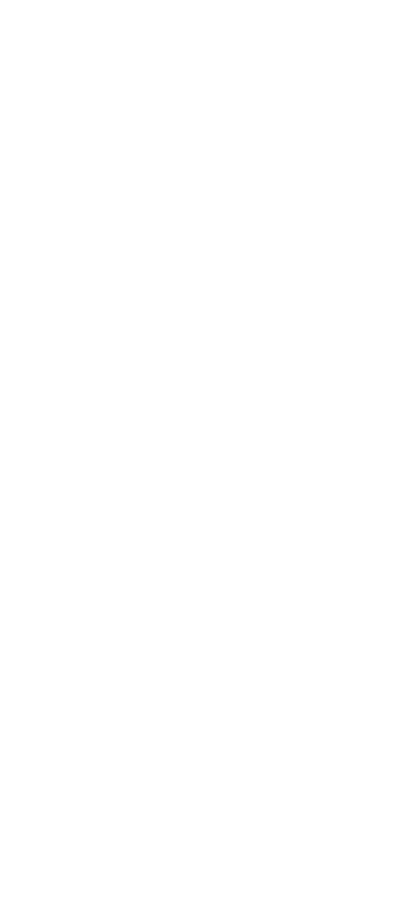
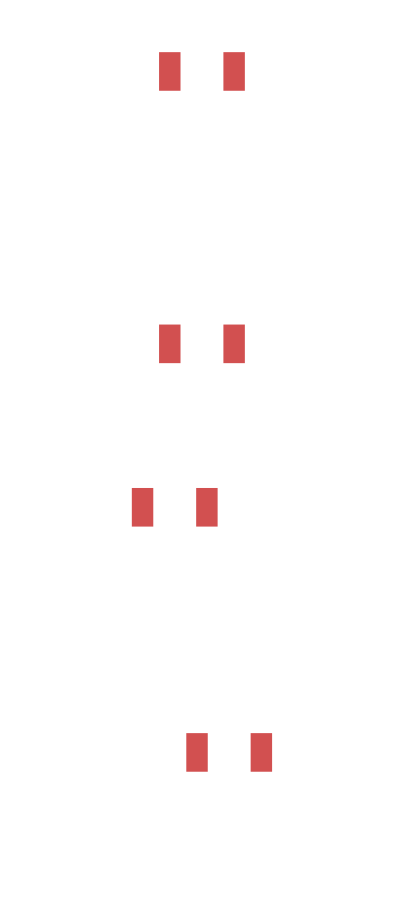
part: none -> (201, 71)
part: none -> (201, 343)
part: none -> (174, 507)
part: none -> (229, 752)

